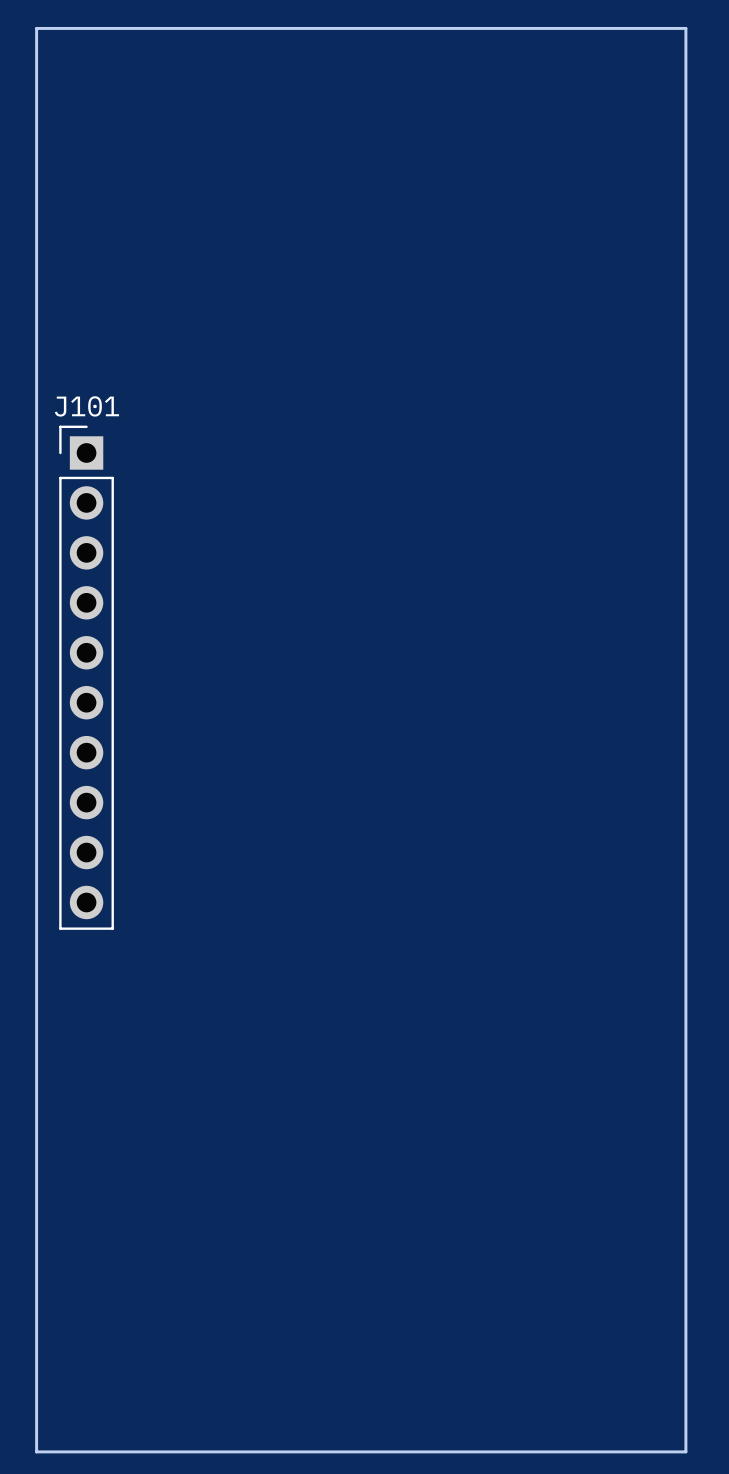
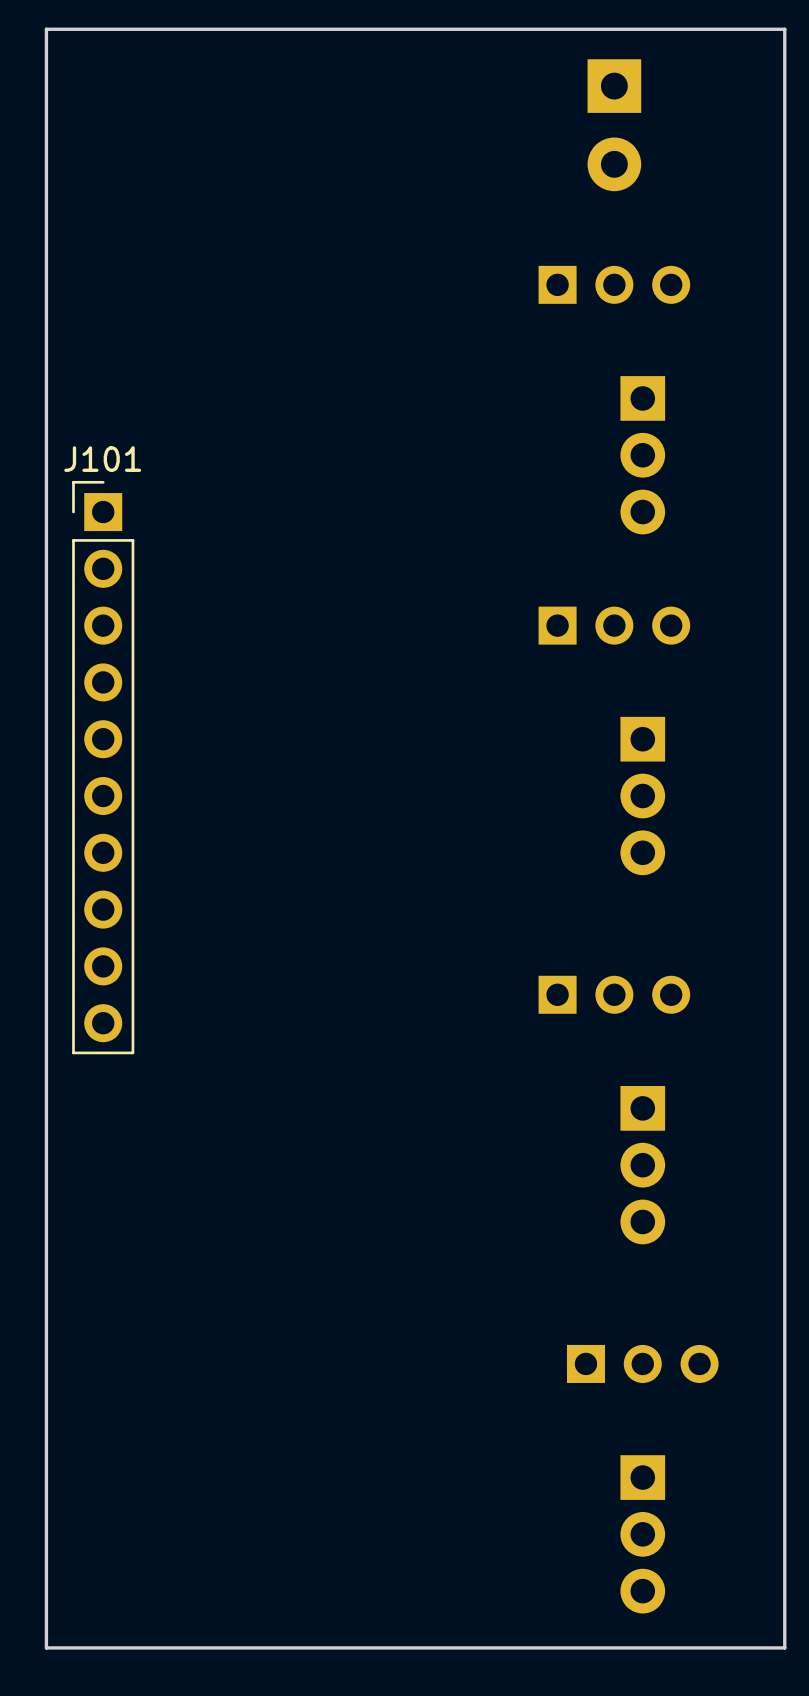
part: none -> (614, 125)
part: none -> (614, 284)
part: none -> (642, 455)
part: none -> (614, 625)
part: none -> (642, 796)
part: none -> (614, 994)
part: none -> (642, 1165)
part: none -> (642, 1363)
part: none -> (642, 1534)

